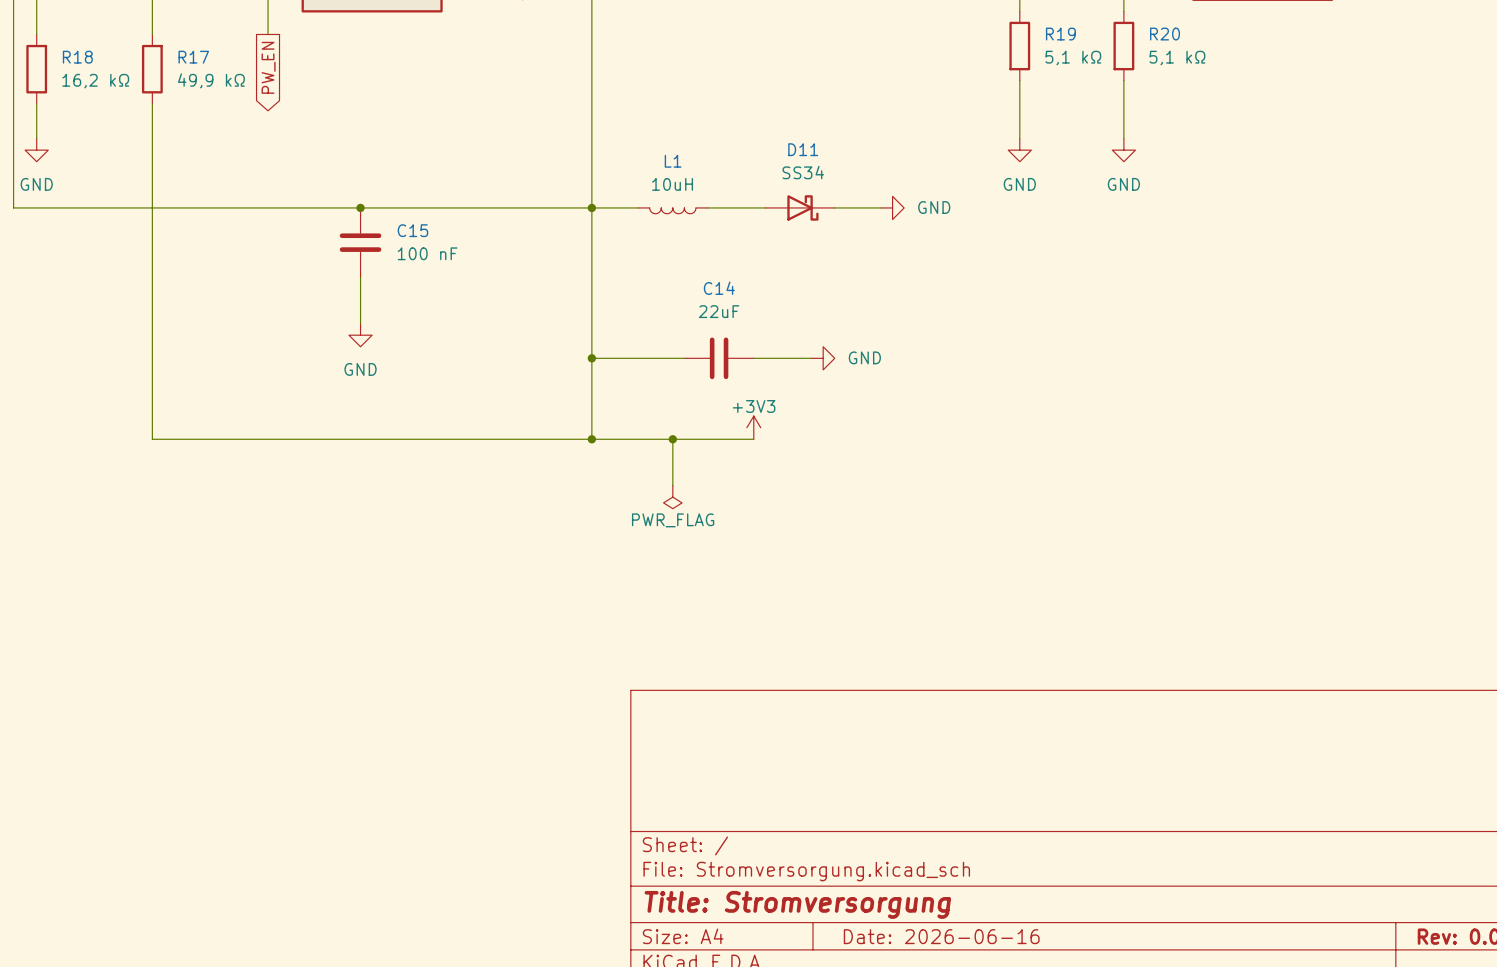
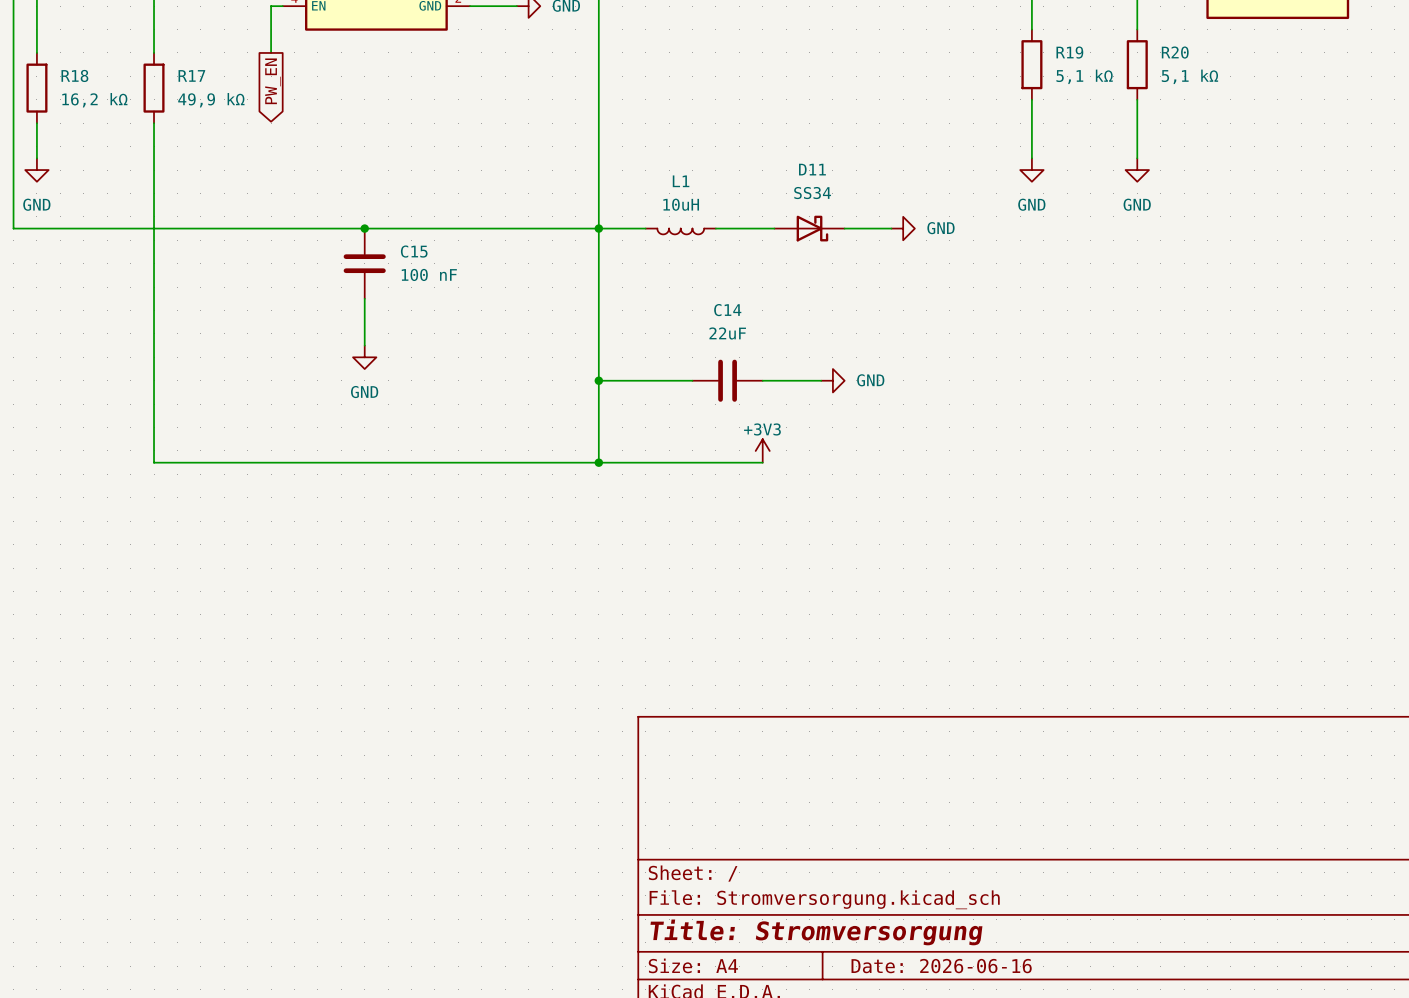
wire: (672, 439) (672, 485) -> none
junction: (672, 439) -> none
power symbol: PWR_FLAG (672, 497) -> none

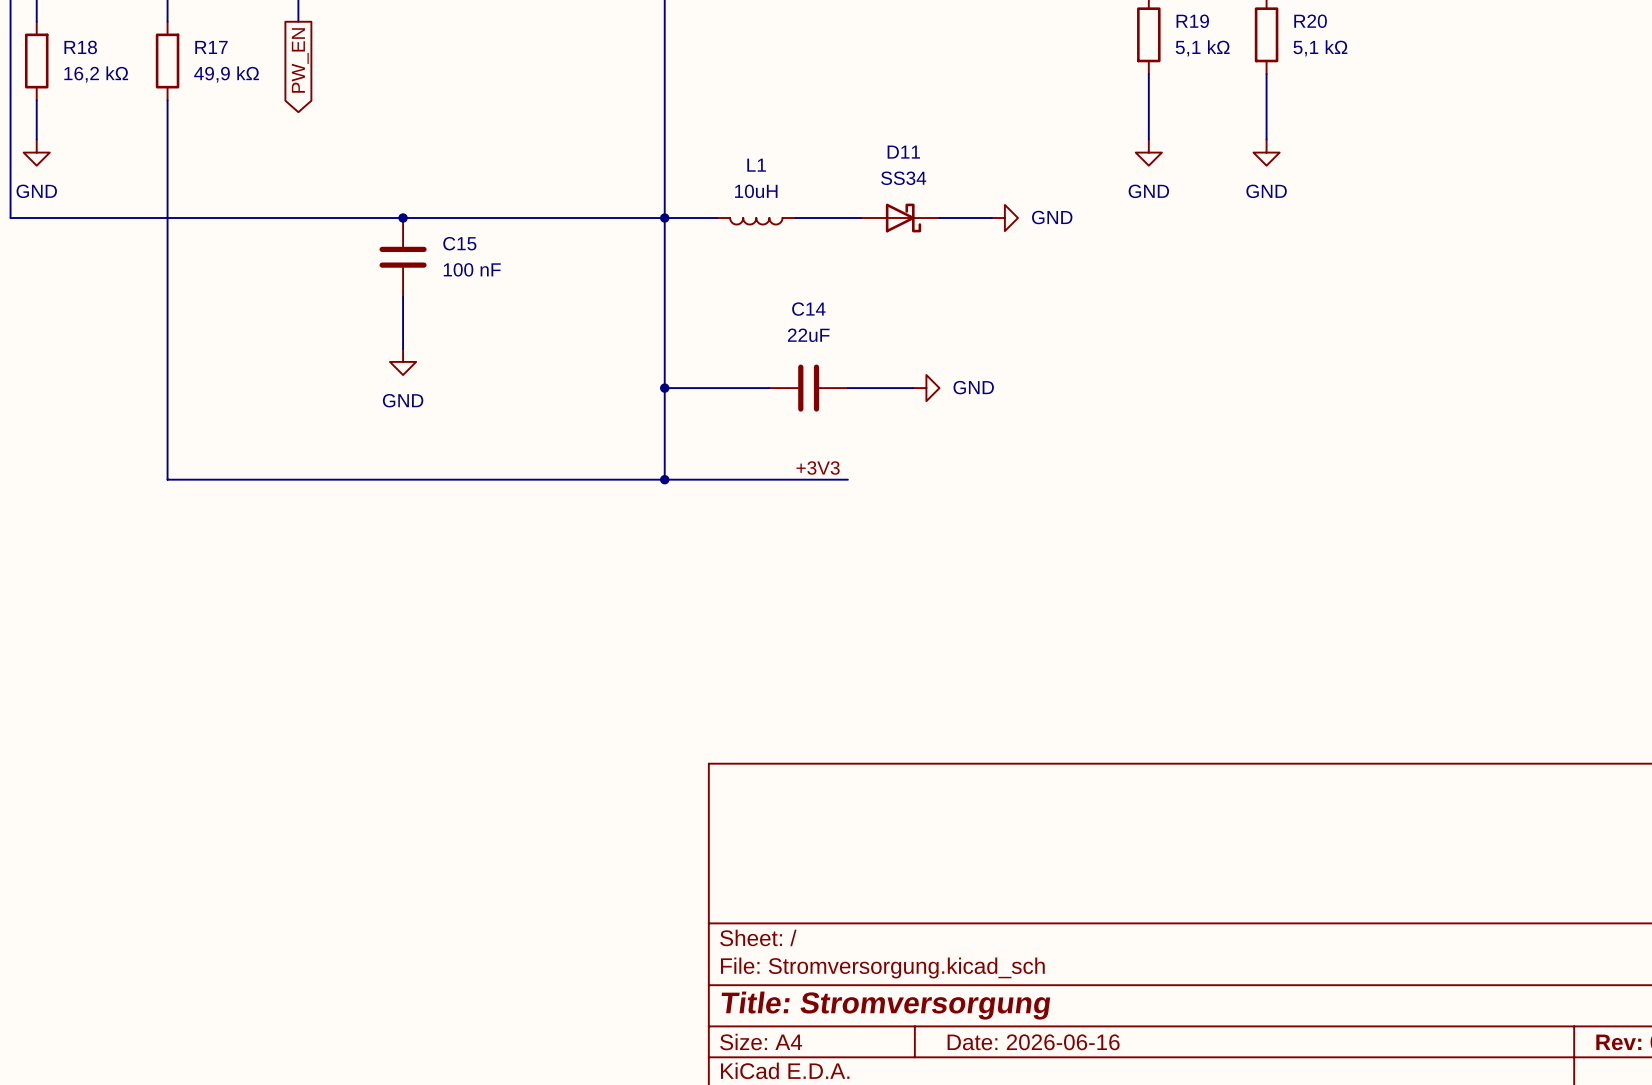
power symbol: +3V3 (762, 450) -> none
label: none -> +3V3 (818, 468)

